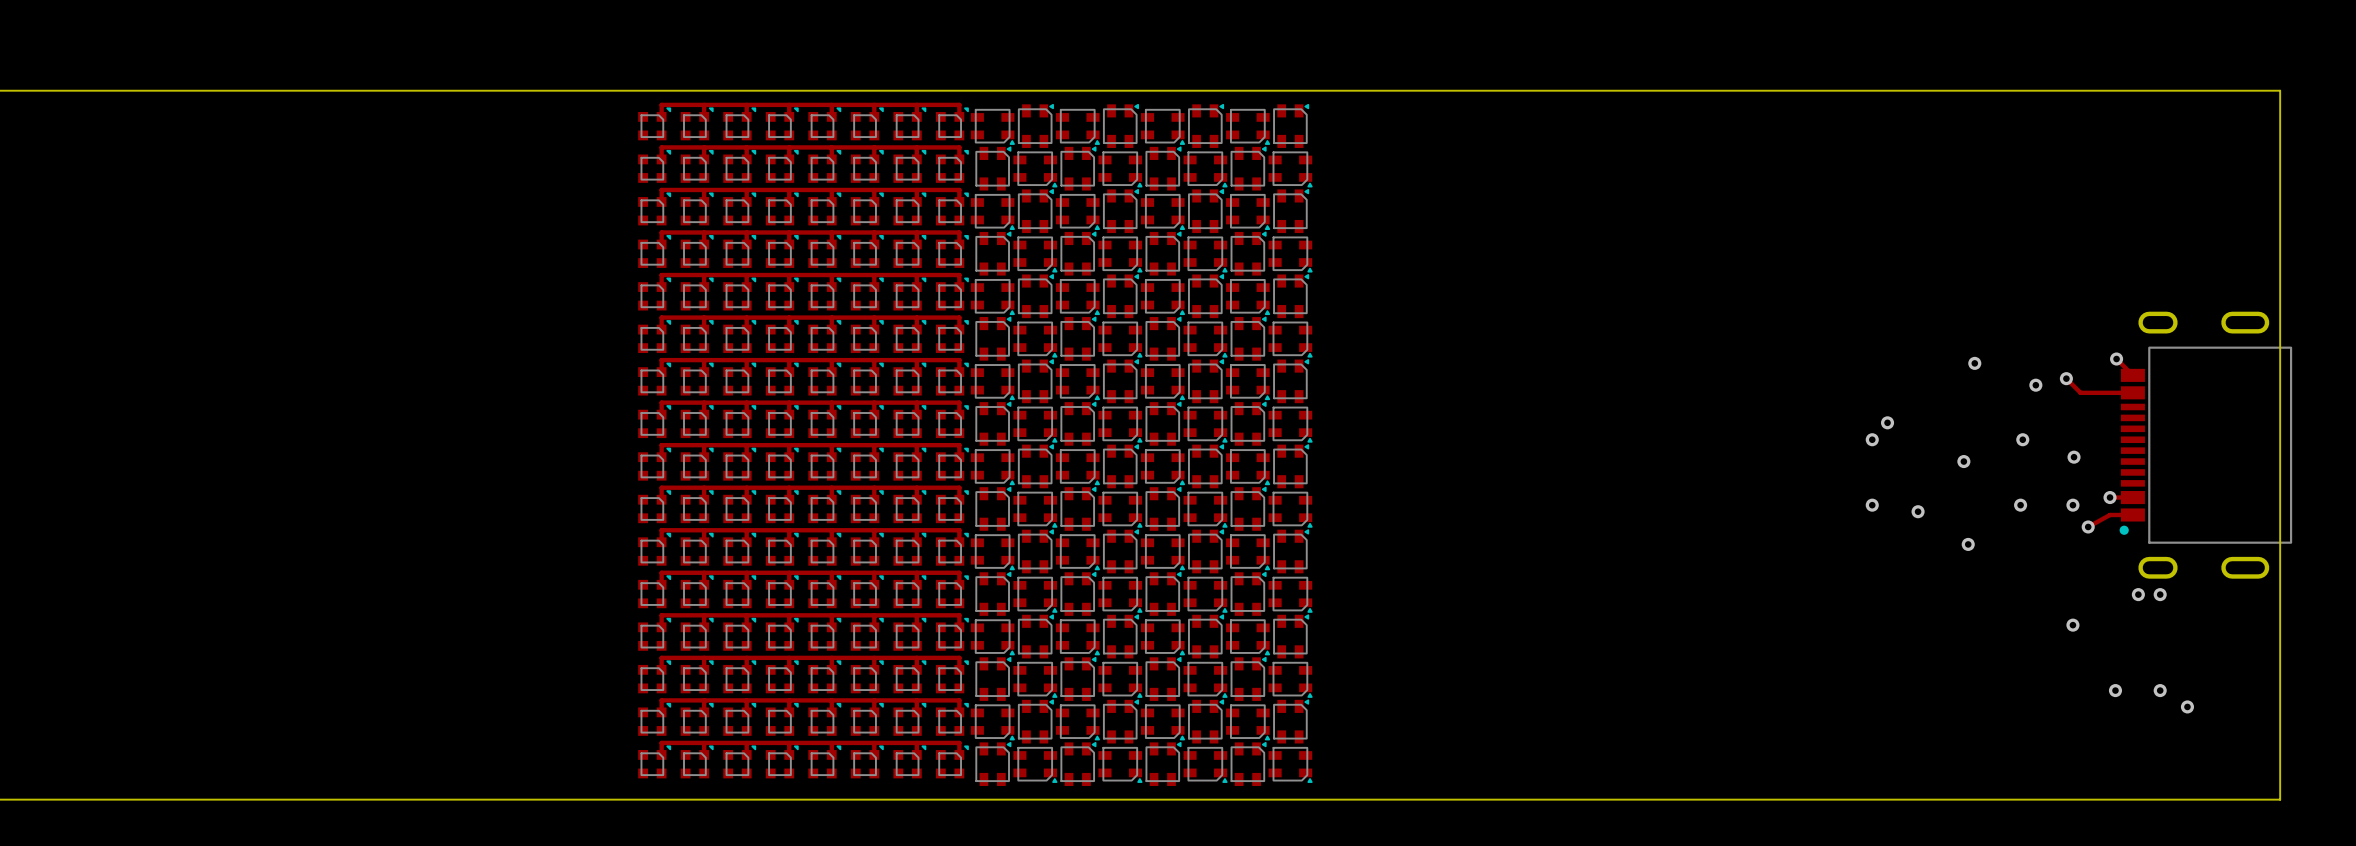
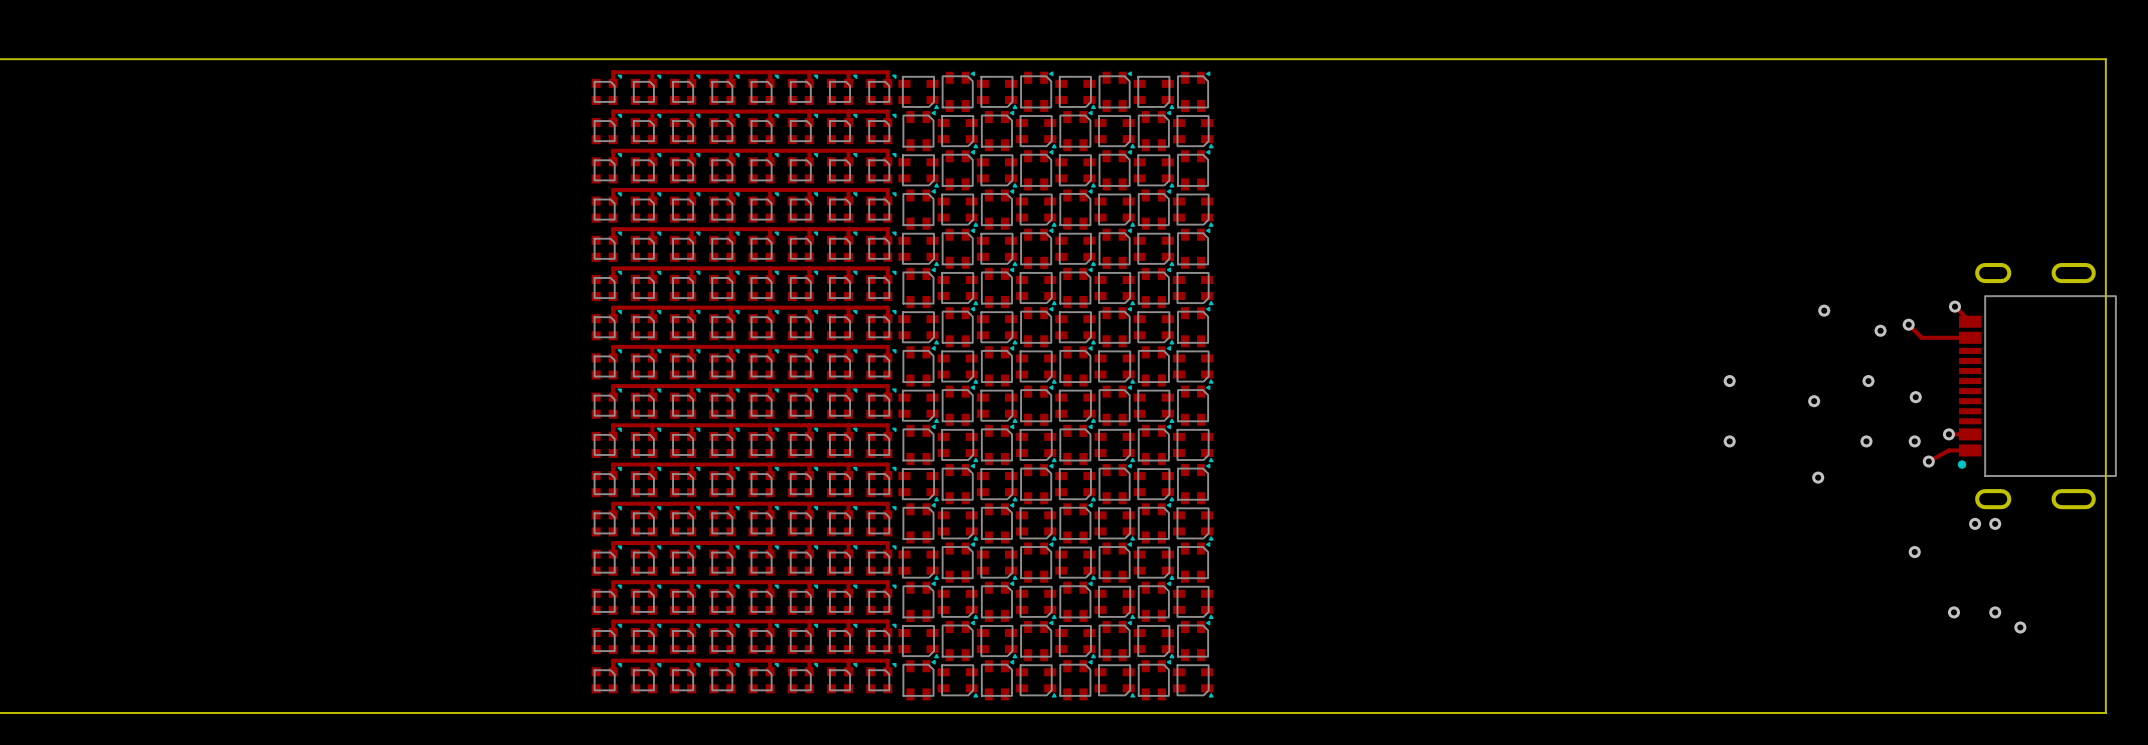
via: (1887, 422) -> none
via: (1918, 511) -> none

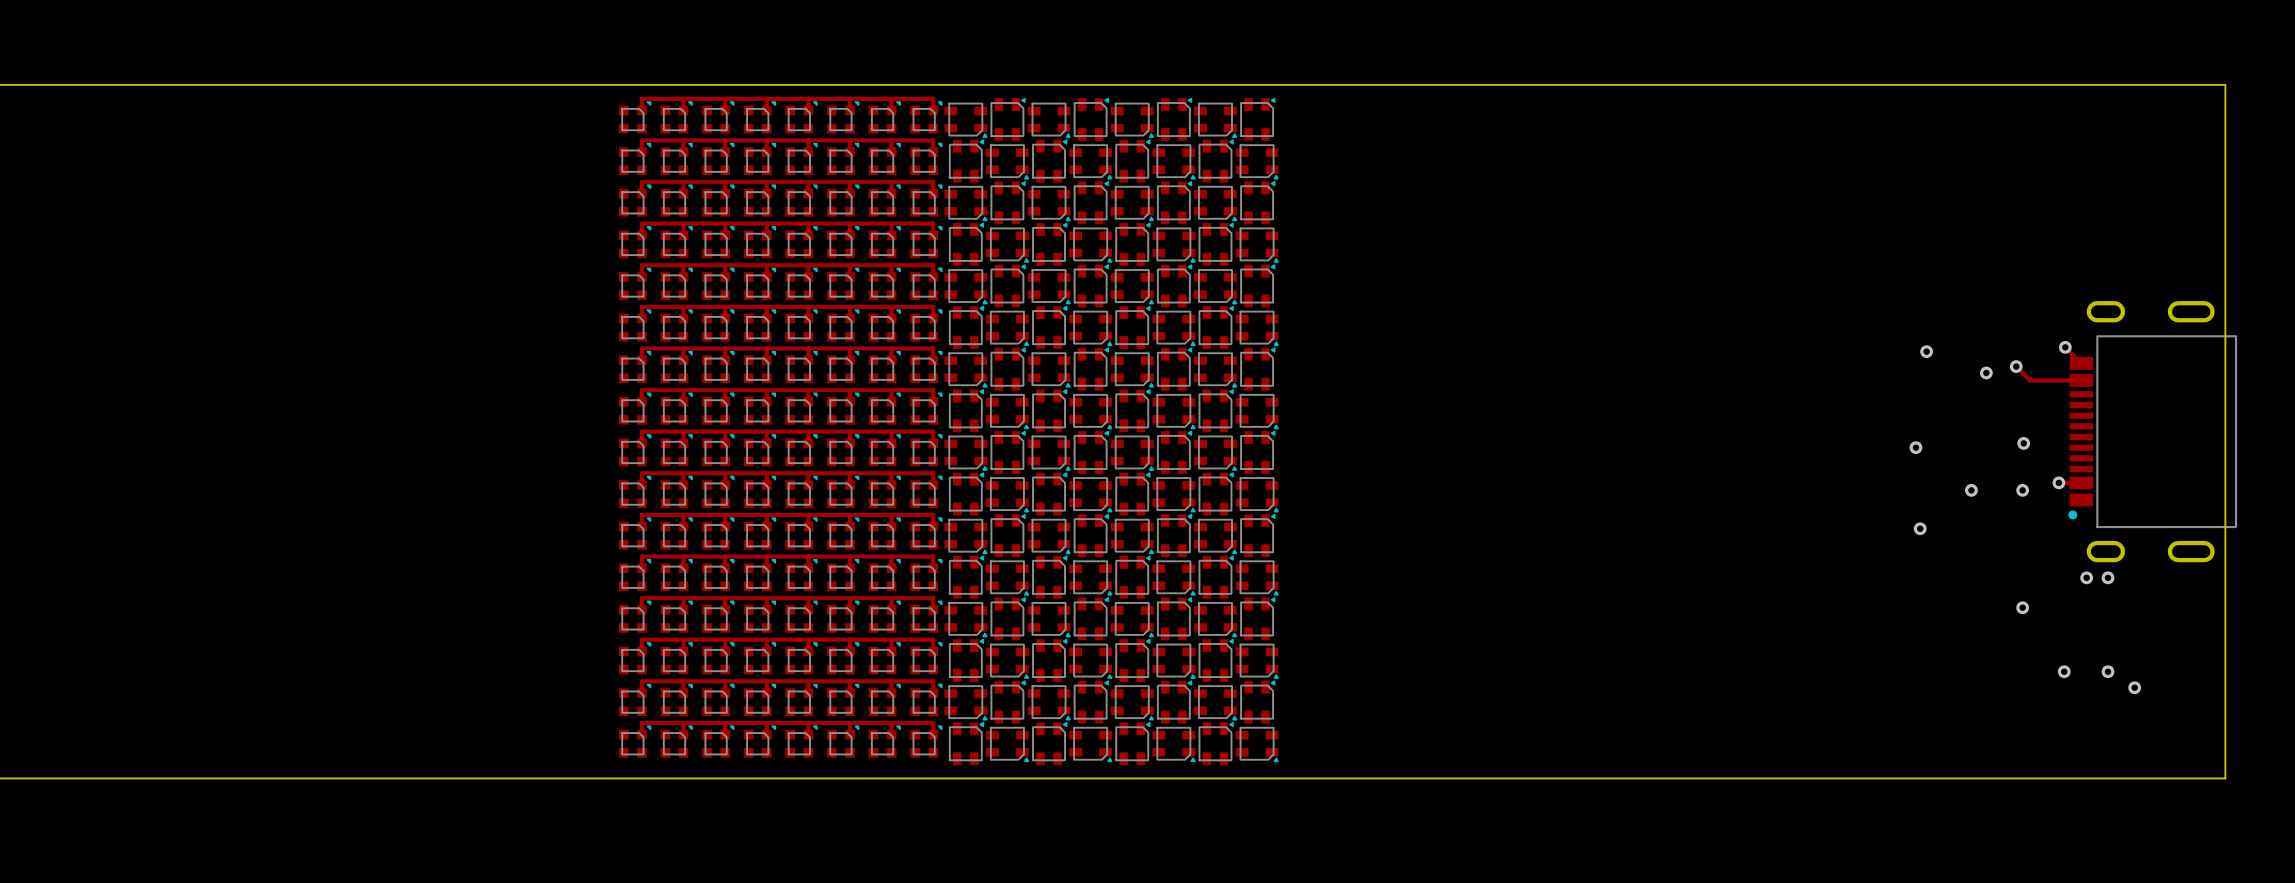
via: (1729, 381) -> none
via: (1868, 381) -> none
via: (1729, 441) -> none
track: (1970, 450) (1948, 450) (1928, 461) -> none
via: (1928, 461) -> none

